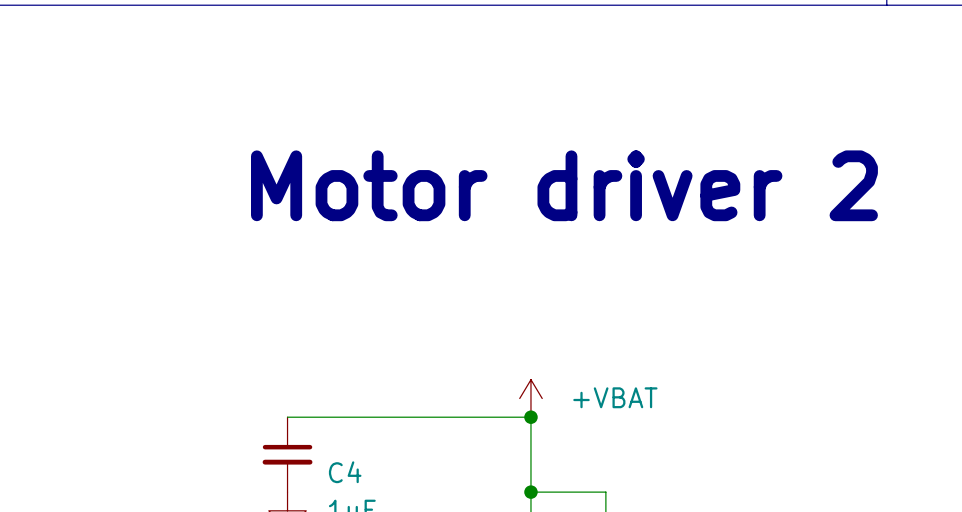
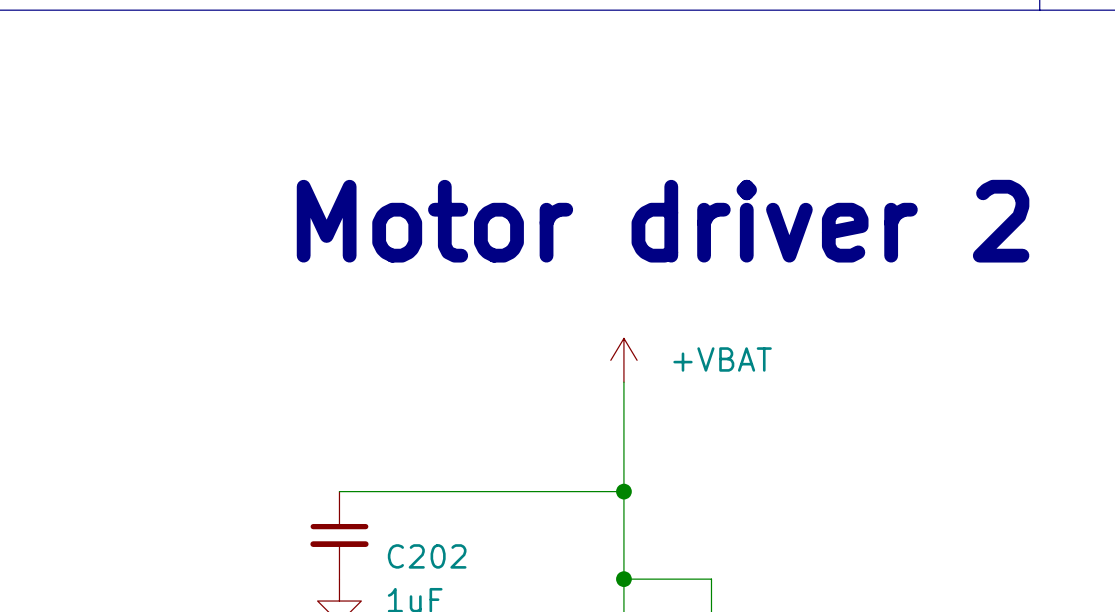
wire: none -> (623, 382) (623, 491)
power symbol position: +VBAT (530, 398) -> +VBAT (623, 360)
C4 name: C4 (345, 472) -> C202 (427, 556)

